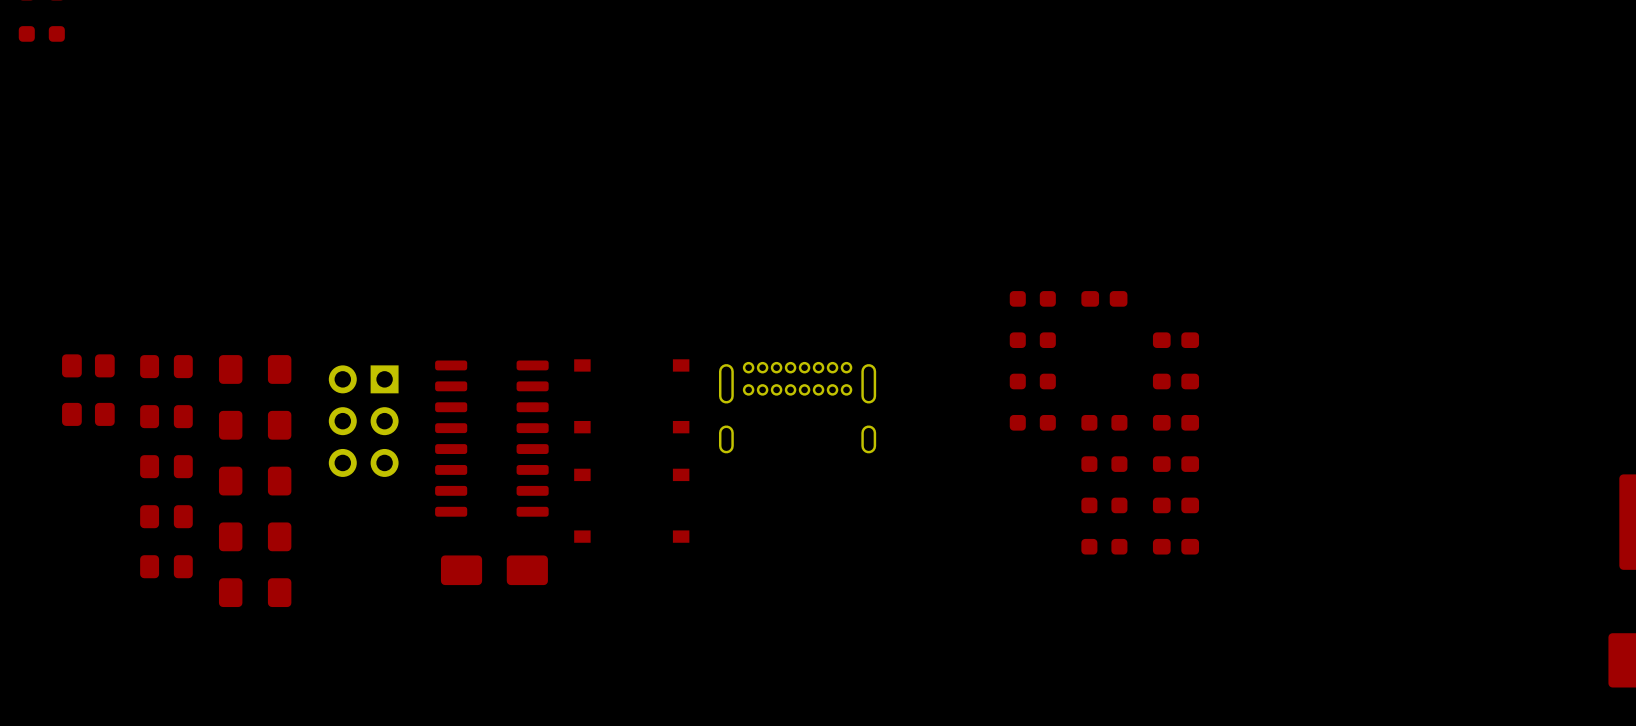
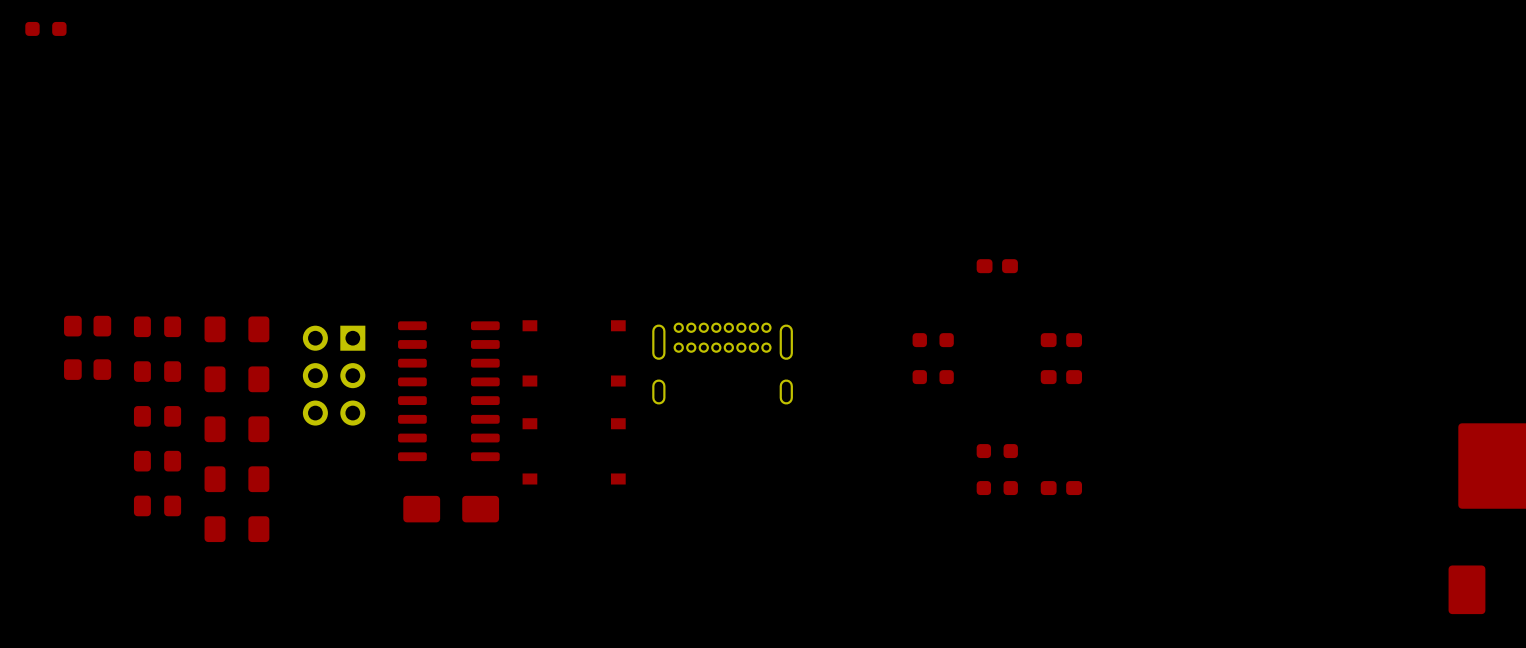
part: (1032, 298) -> none
part: (1032, 340) -> none
part: (1175, 340) -> none
part: (1104, 422) -> none
part: (1104, 464) -> none
part: (1175, 464) -> none
part: (1175, 505) -> none

